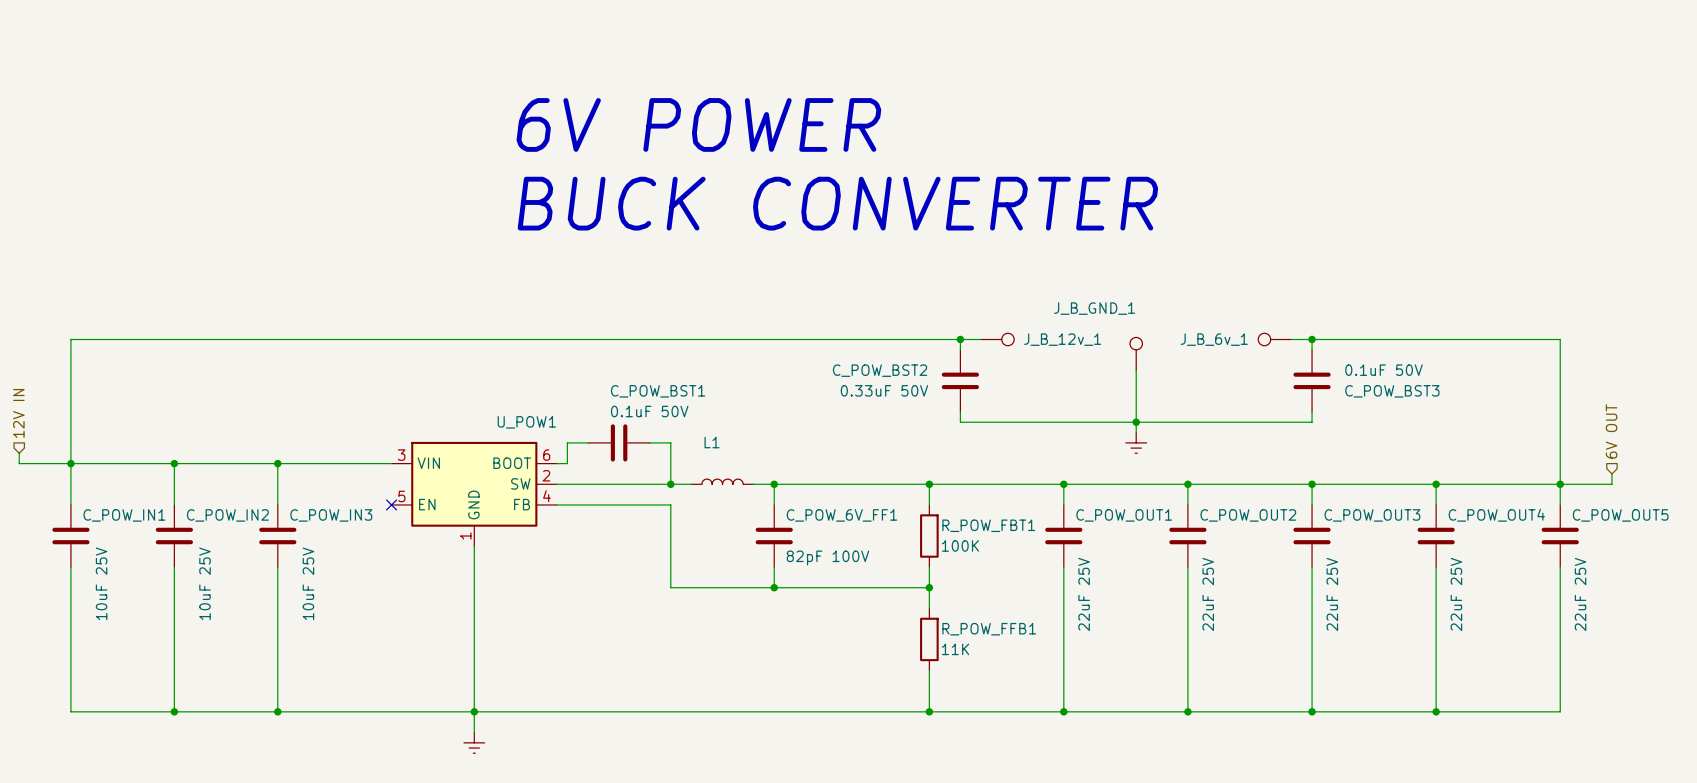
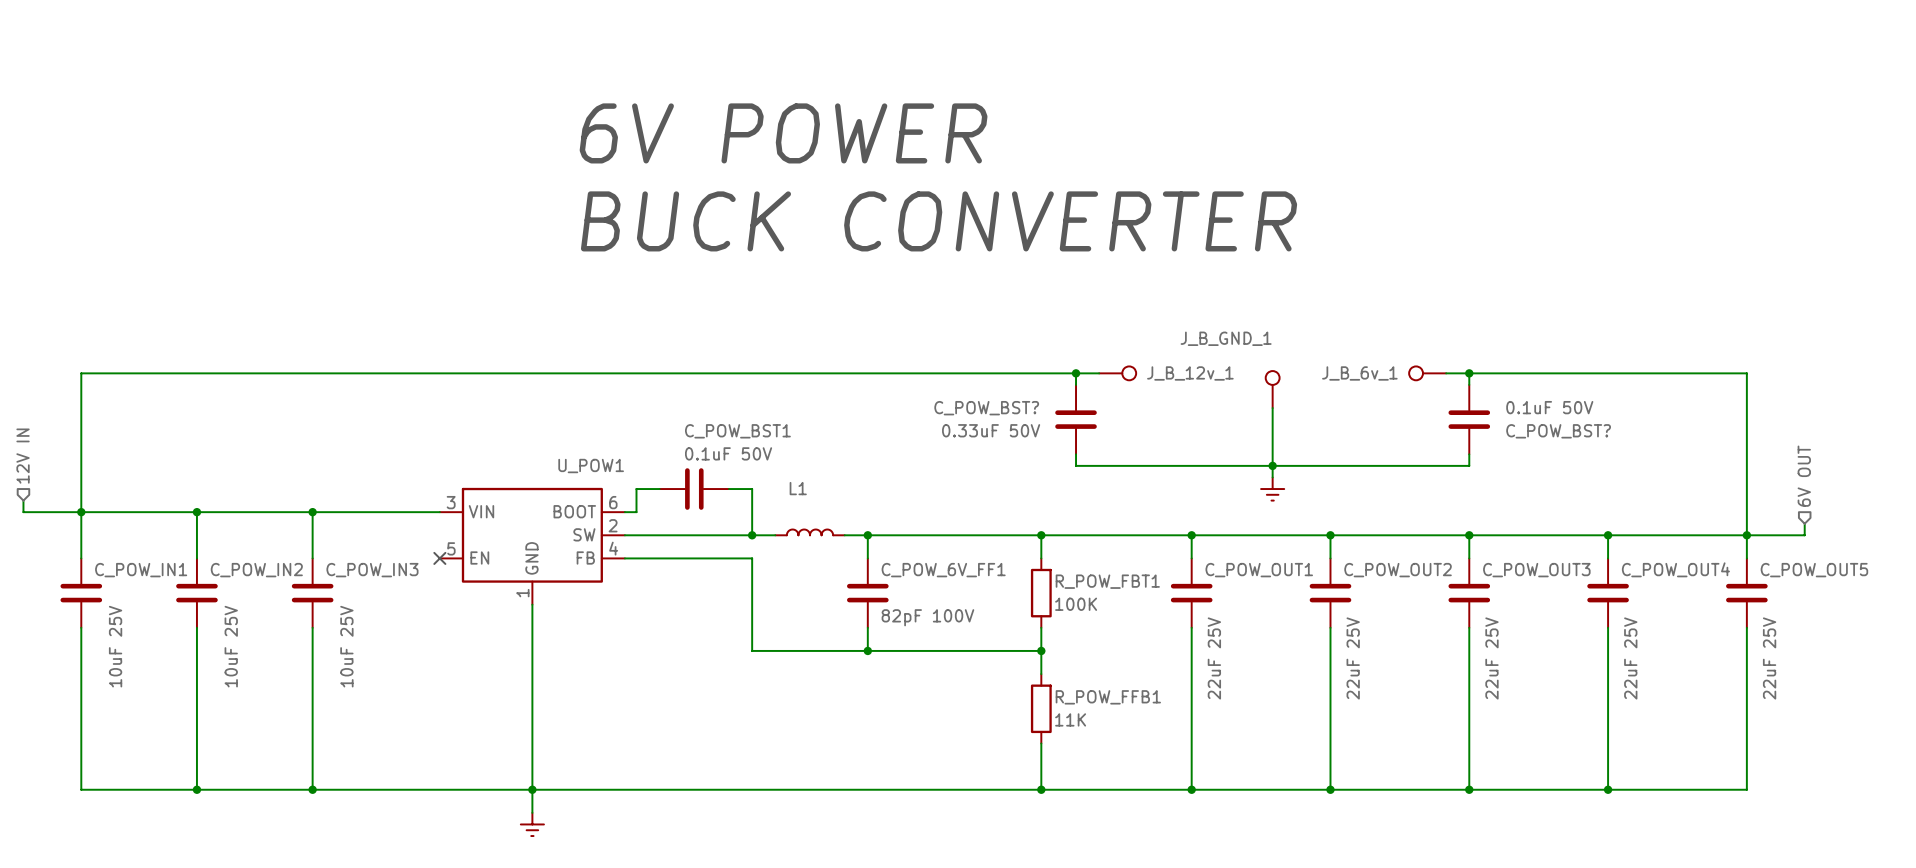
C_POW_BST2 name: C_POW_BST2 (880, 370) -> C_POW_BST? (986, 408)
C_POW_BST3 name: C_POW_BST3 (1392, 391) -> C_POW_BST? (1558, 431)

